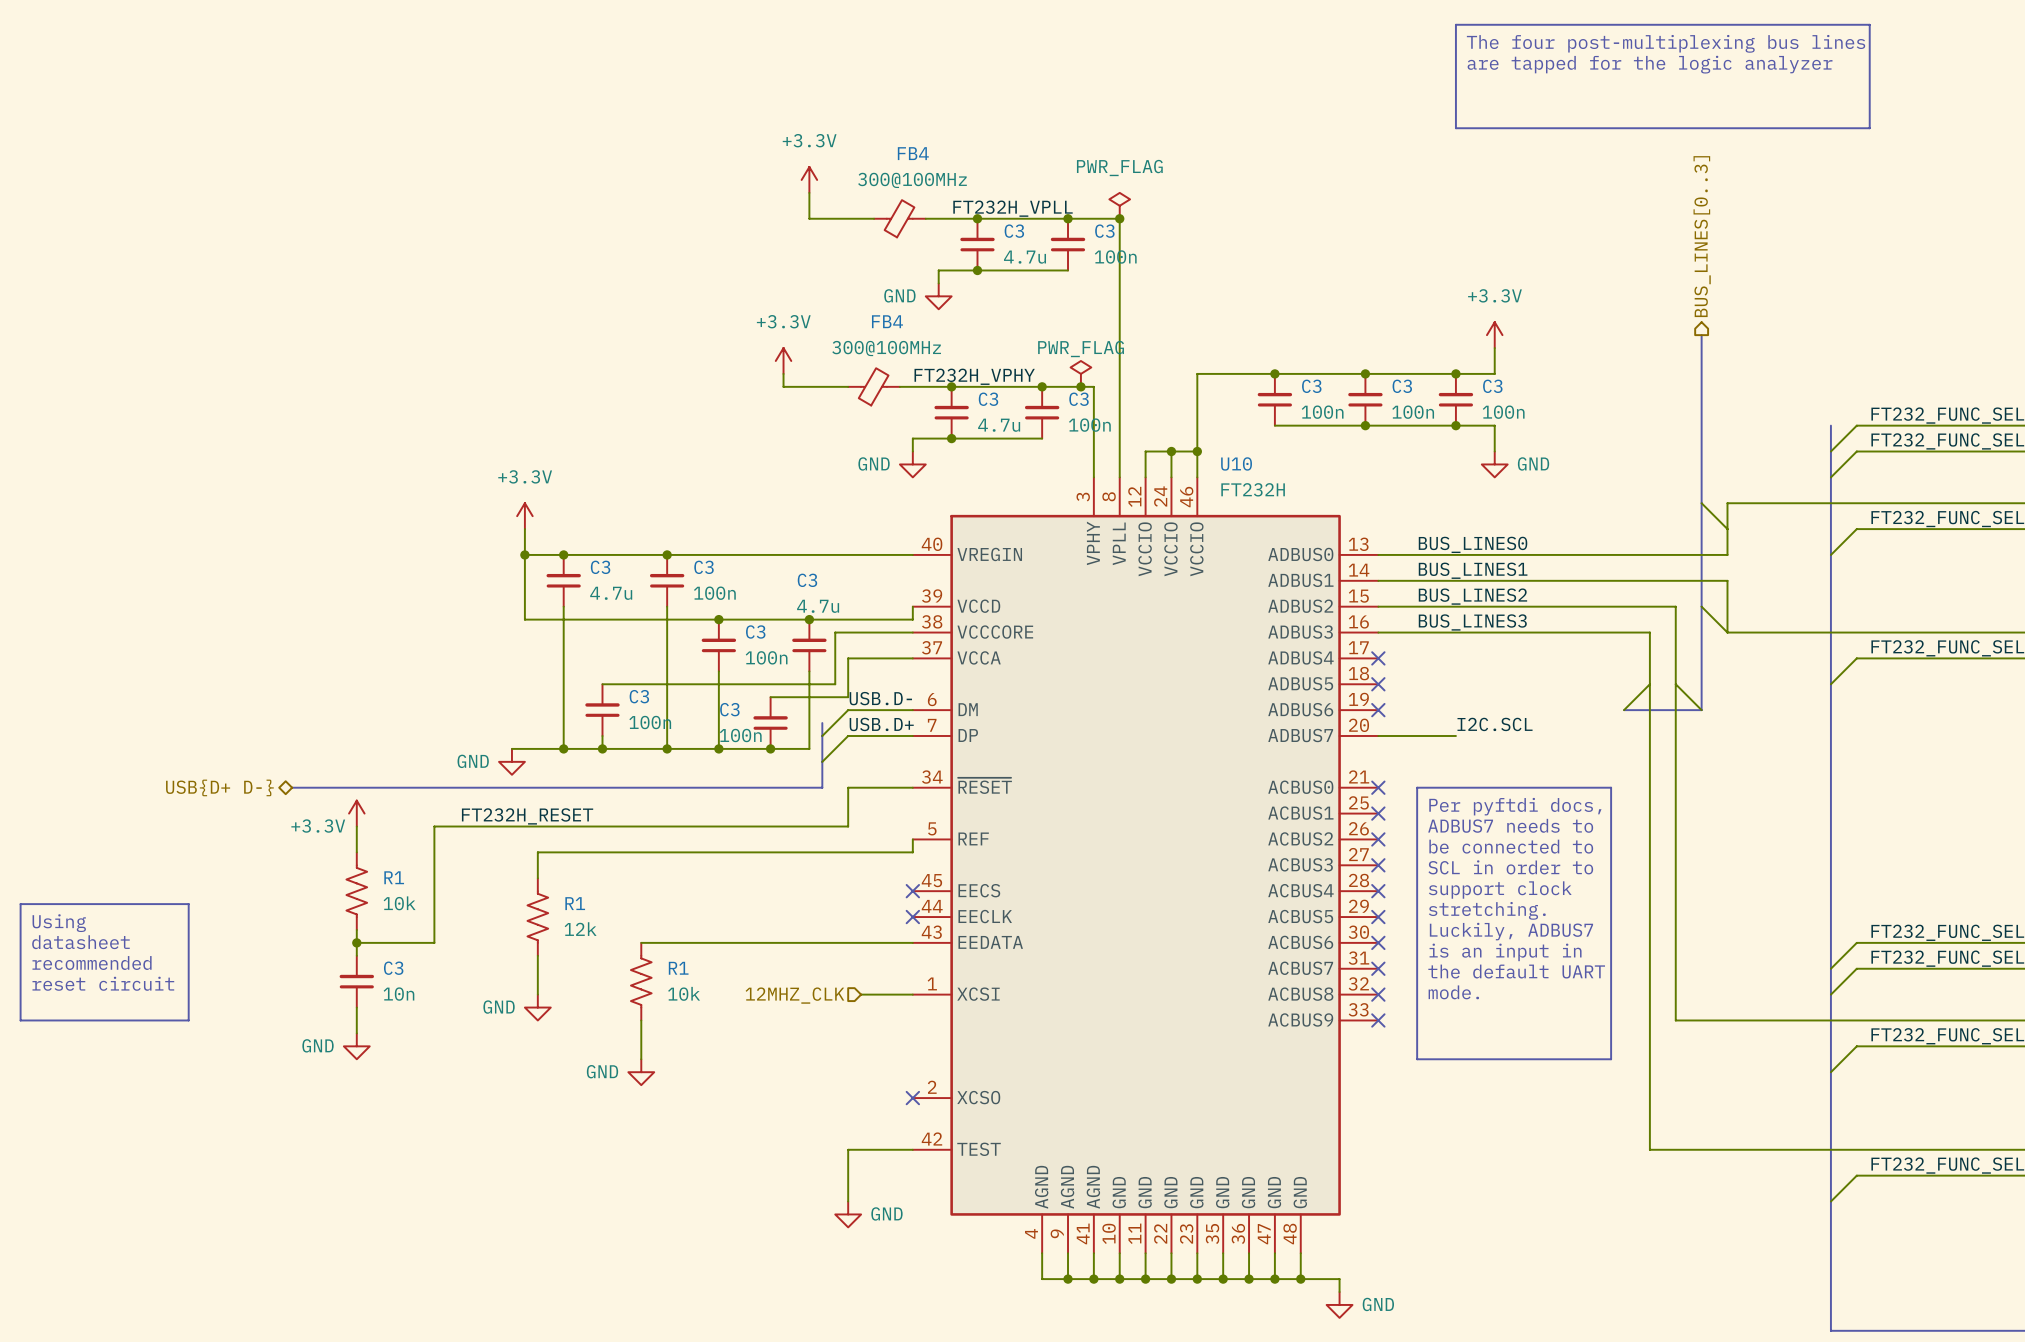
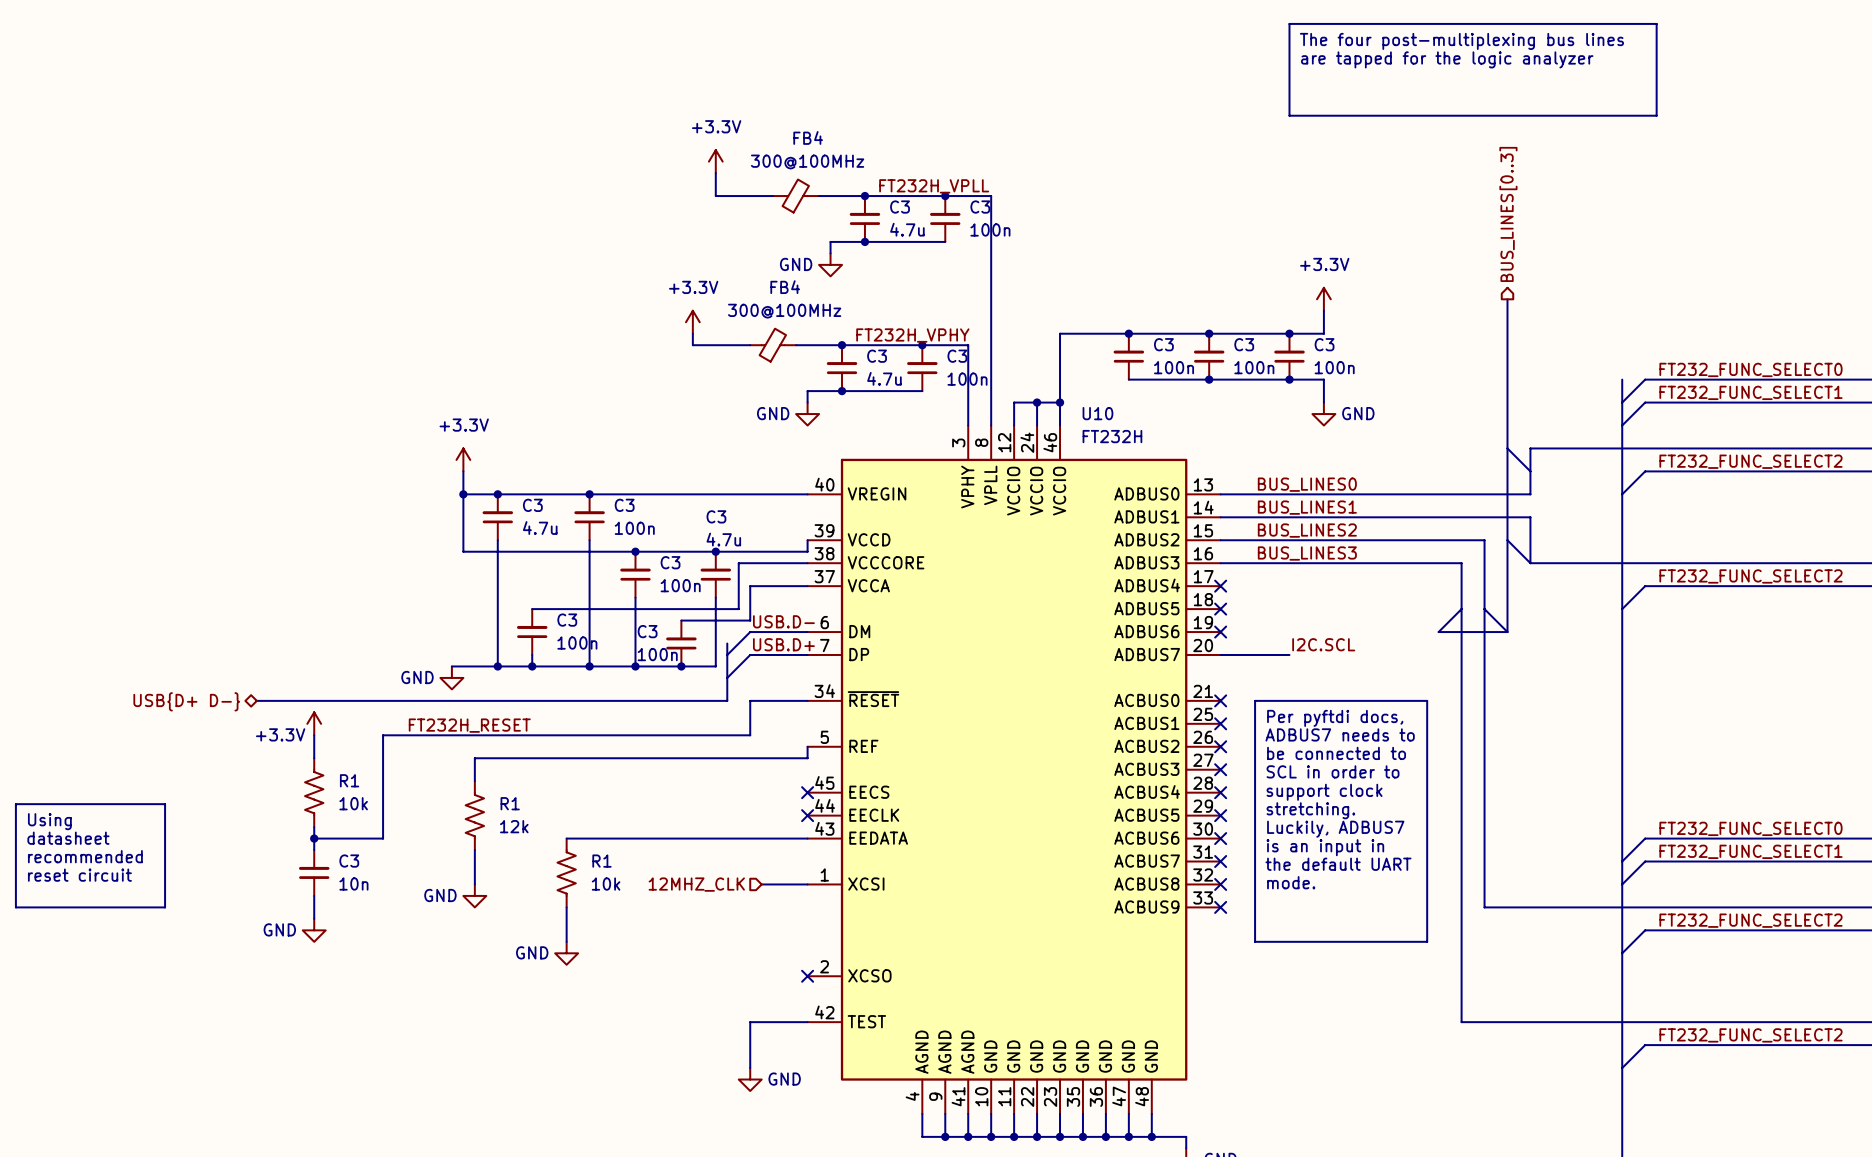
power symbol: PWR_FLAG (1119, 205) -> none
label position: FT232H_VPLL (1013, 208) -> FT232H_VPLL (934, 186)
junction: (1119, 218) -> none
power symbol: PWR_FLAG (1080, 373) -> none
label position: FT232H_VPHY (974, 376) -> FT232H_VPHY (912, 335)
junction: (1080, 386) -> none

